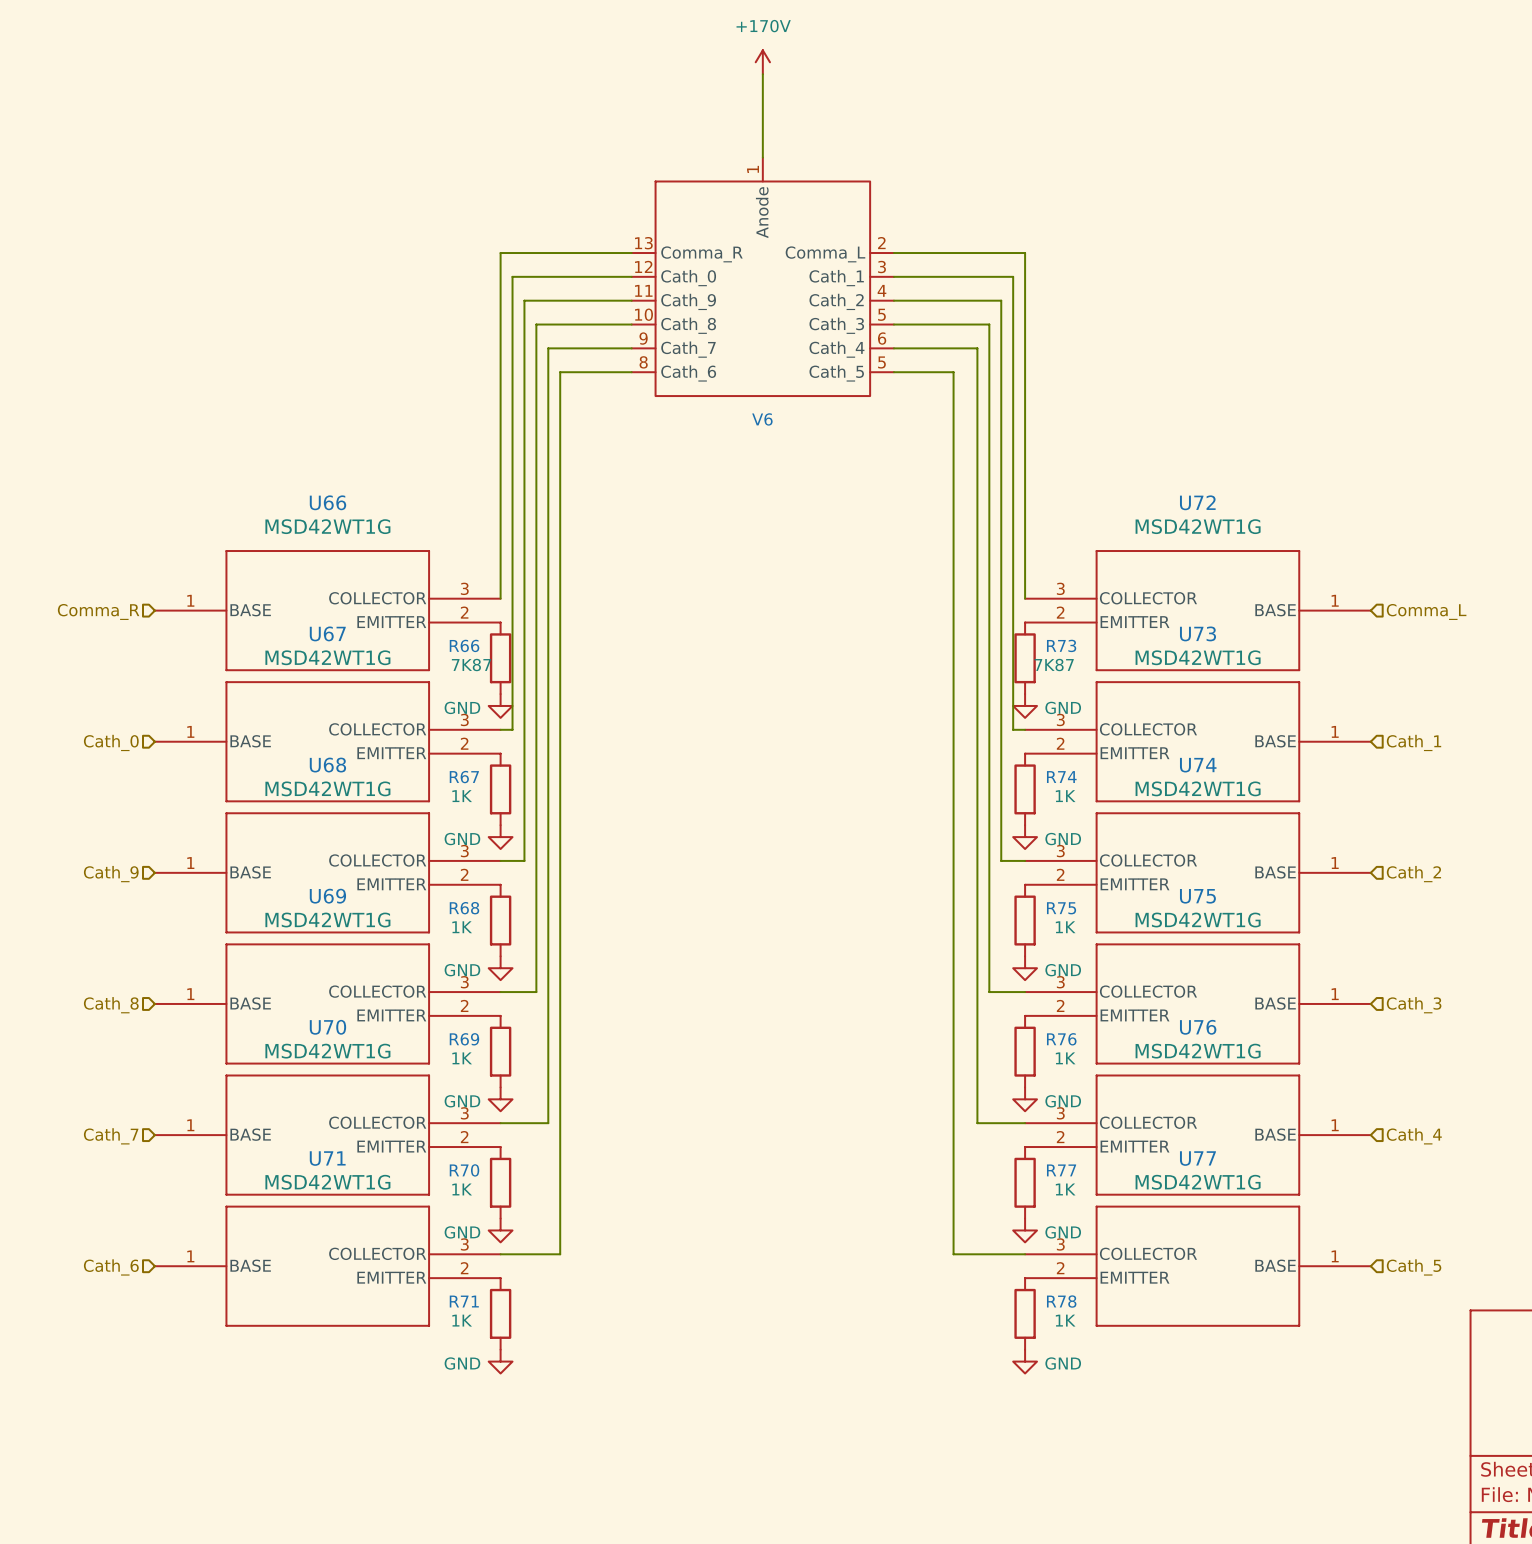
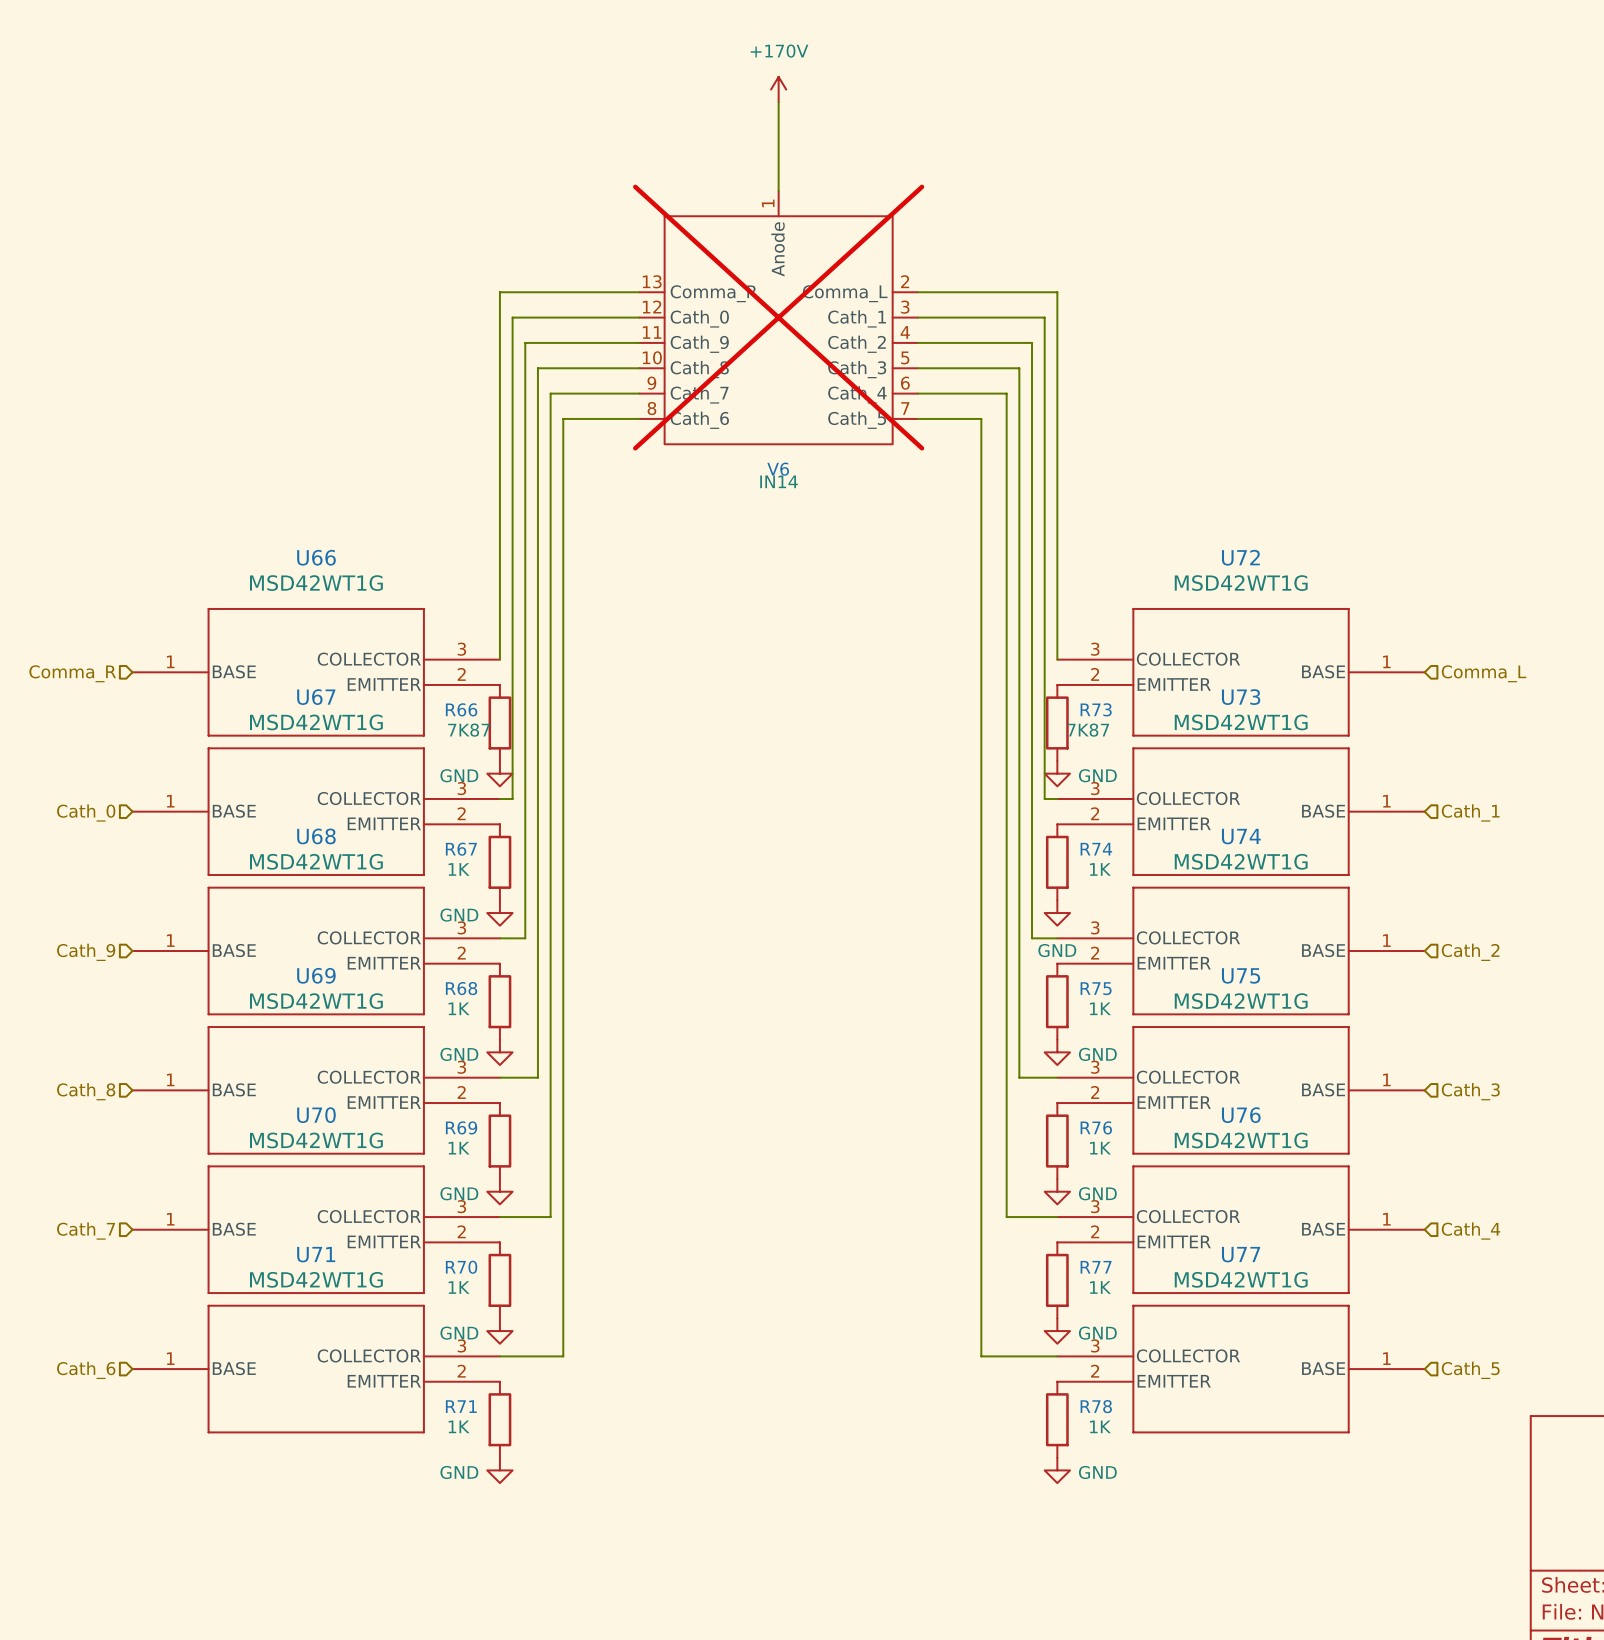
V6 do-not-place cross: none -> (778, 317)
V6 pin number: 5 (881, 362) -> 7 (905, 408)
V6 value: none -> IN14 (779, 481)
power symbol text position: GND (1063, 839) -> GND (1057, 950)

